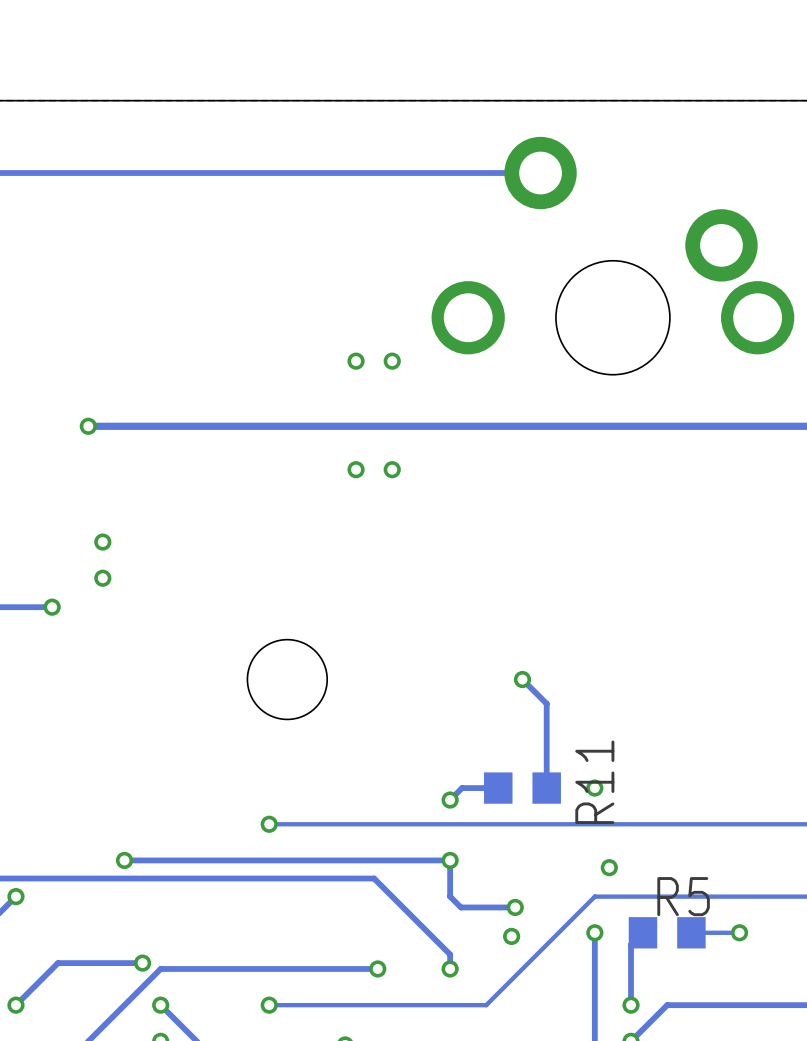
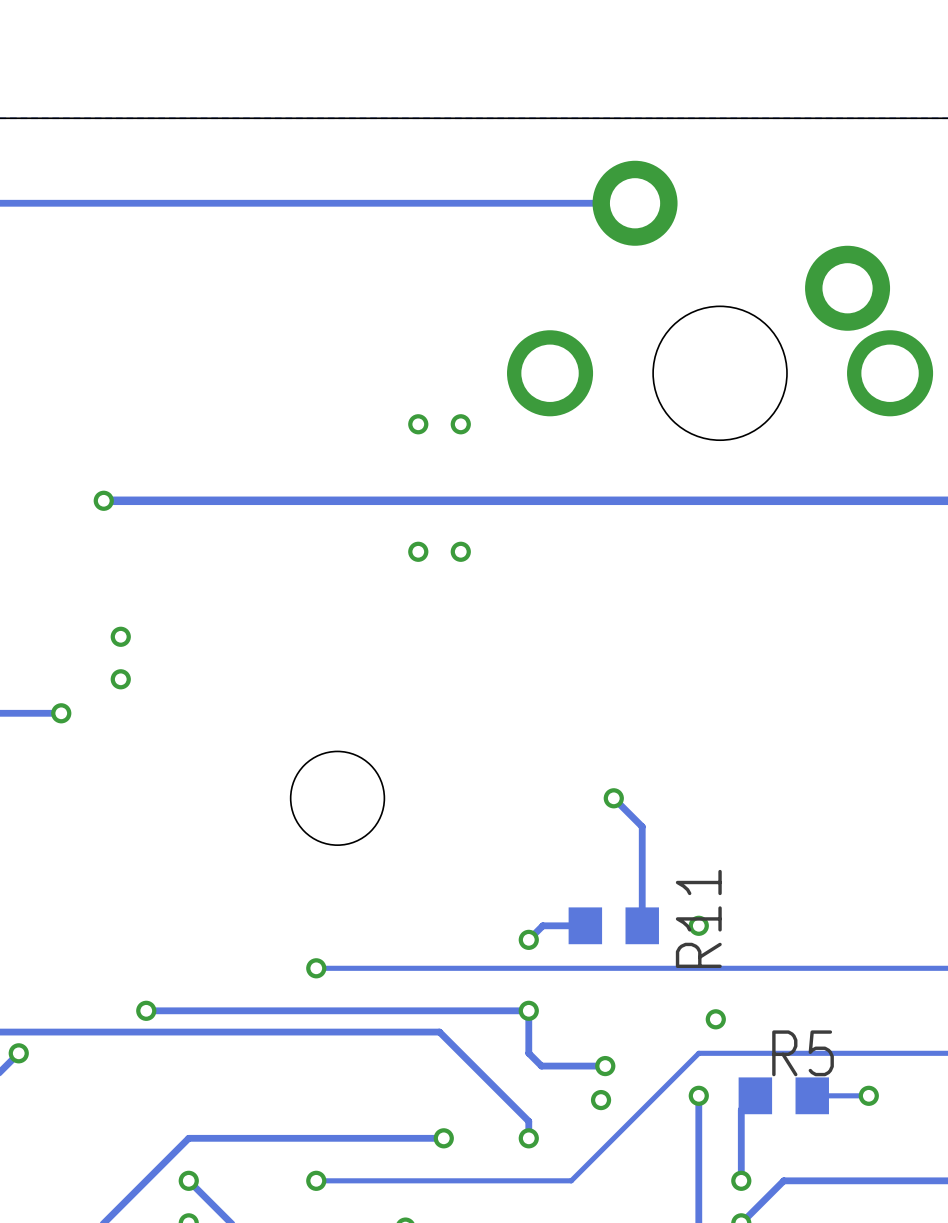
track: (142, 963) (58, 963) (15, 1005) -> none
via: (142, 963) -> none
via: (15, 1005) -> none

